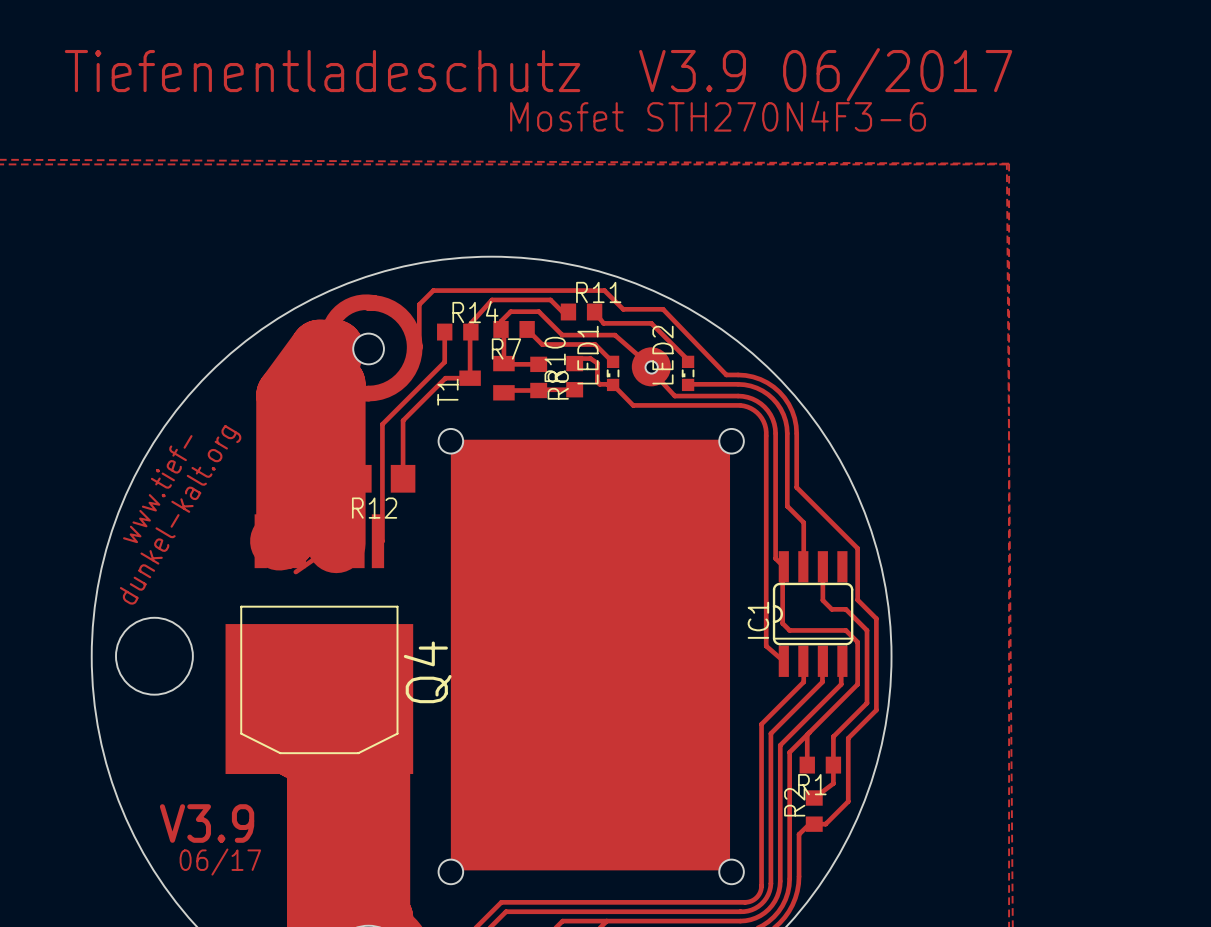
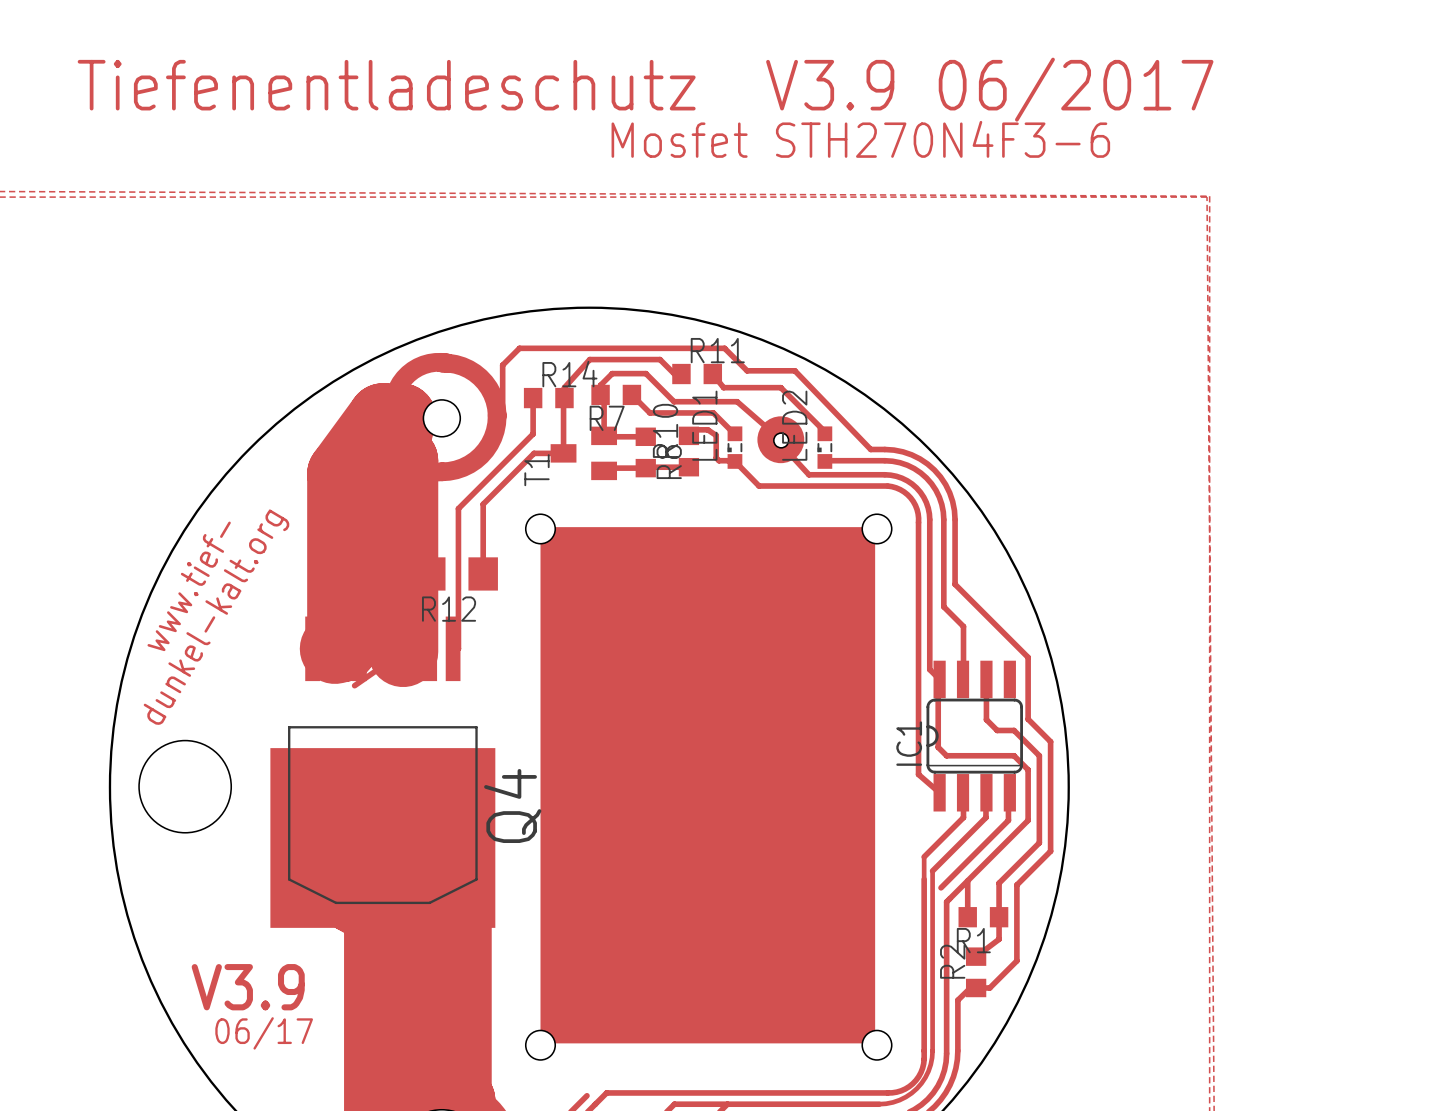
track: (770, 714) (761, 724) (761, 885) (760, 892) (755, 898) (745, 902) (501, 902) (489, 914) -> none
track: (777, 726) (770, 733) -> (924, 856) (924, 879)
track: (784, 740) (780, 745) (778, 891) (772, 905) (760, 915) (745, 920) (733, 921) -> (932, 870) (932, 1050) (930, 1064) (925, 1077) (911, 1093) (899, 1100) (879, 1104)

